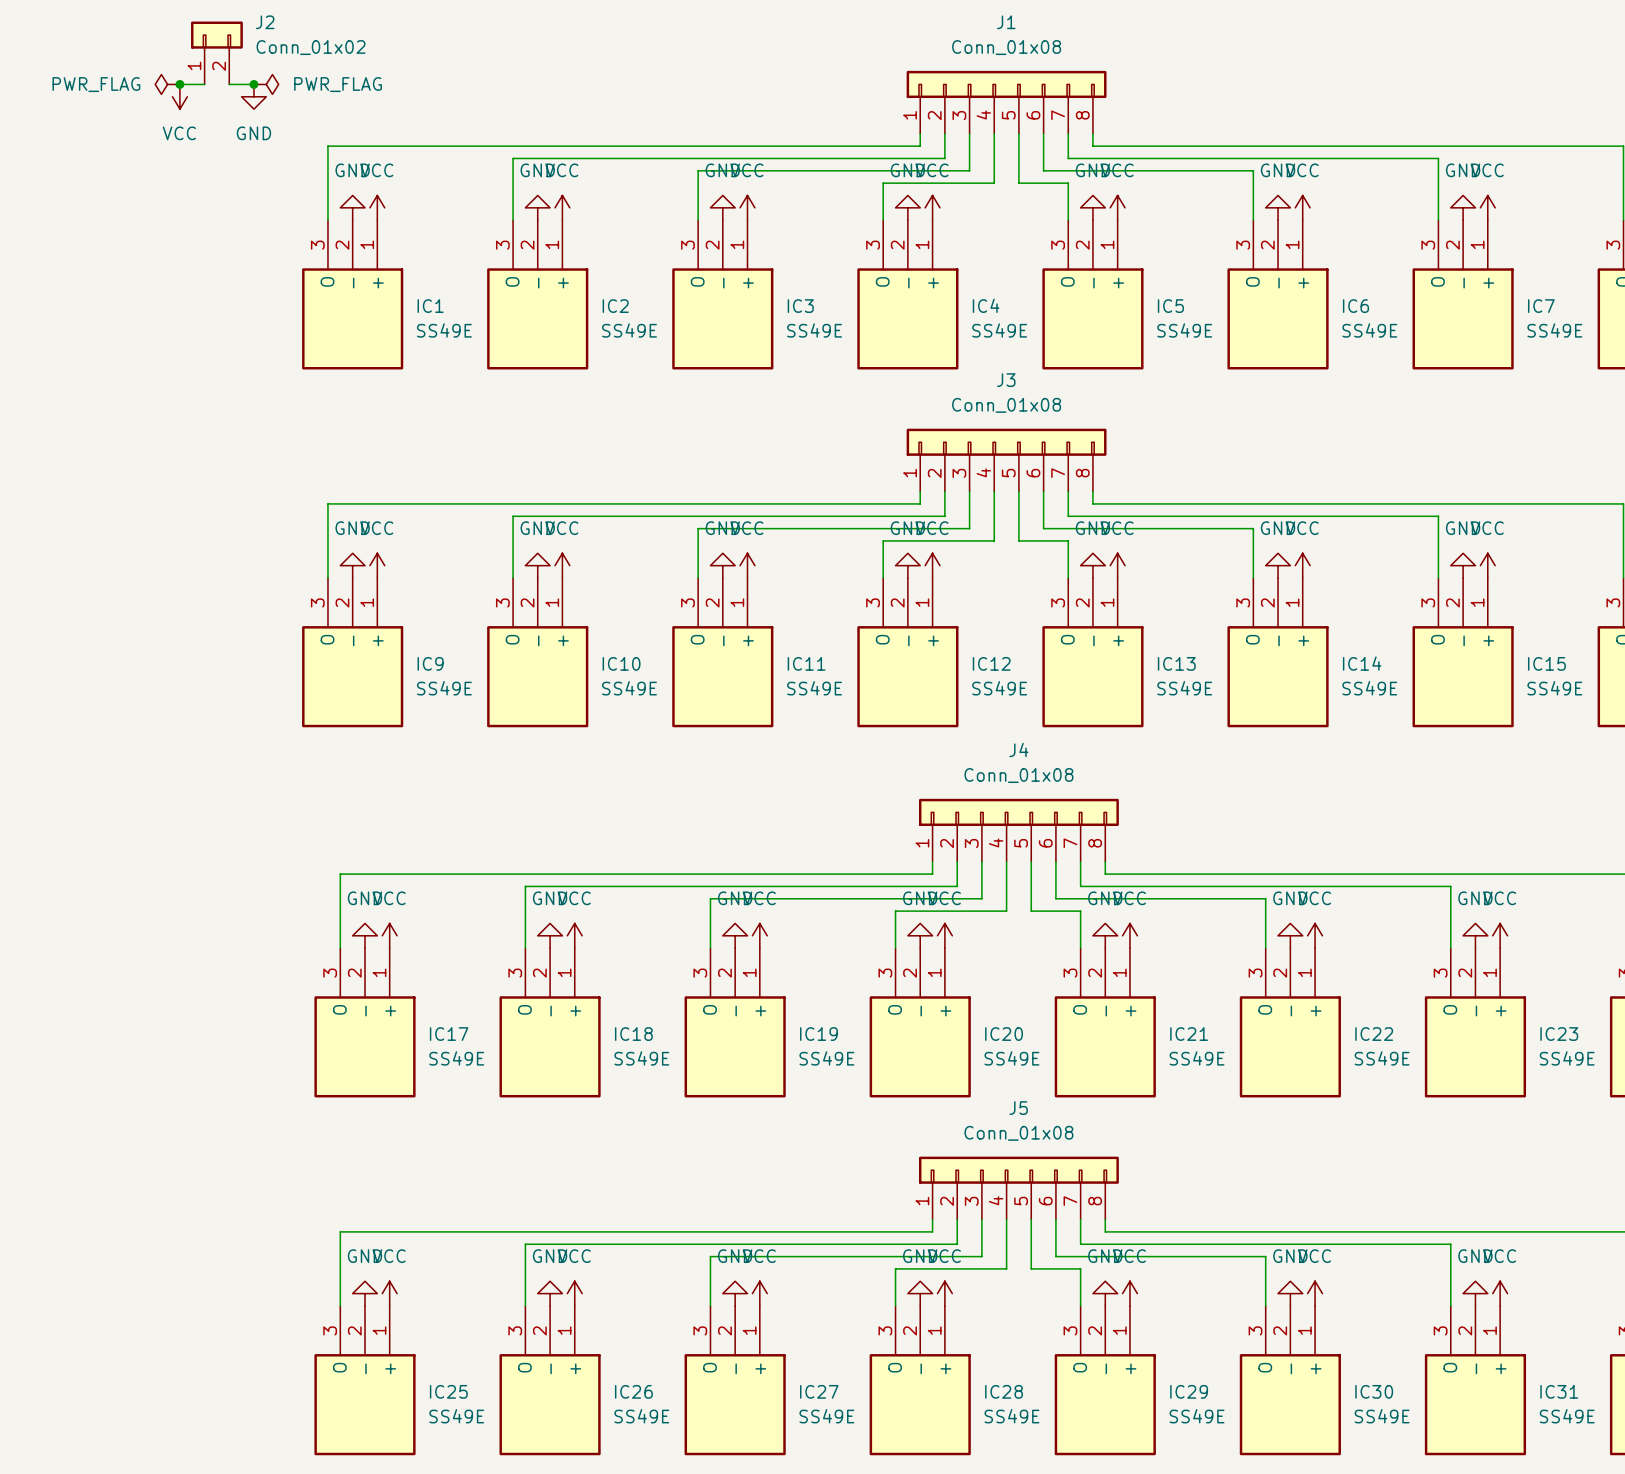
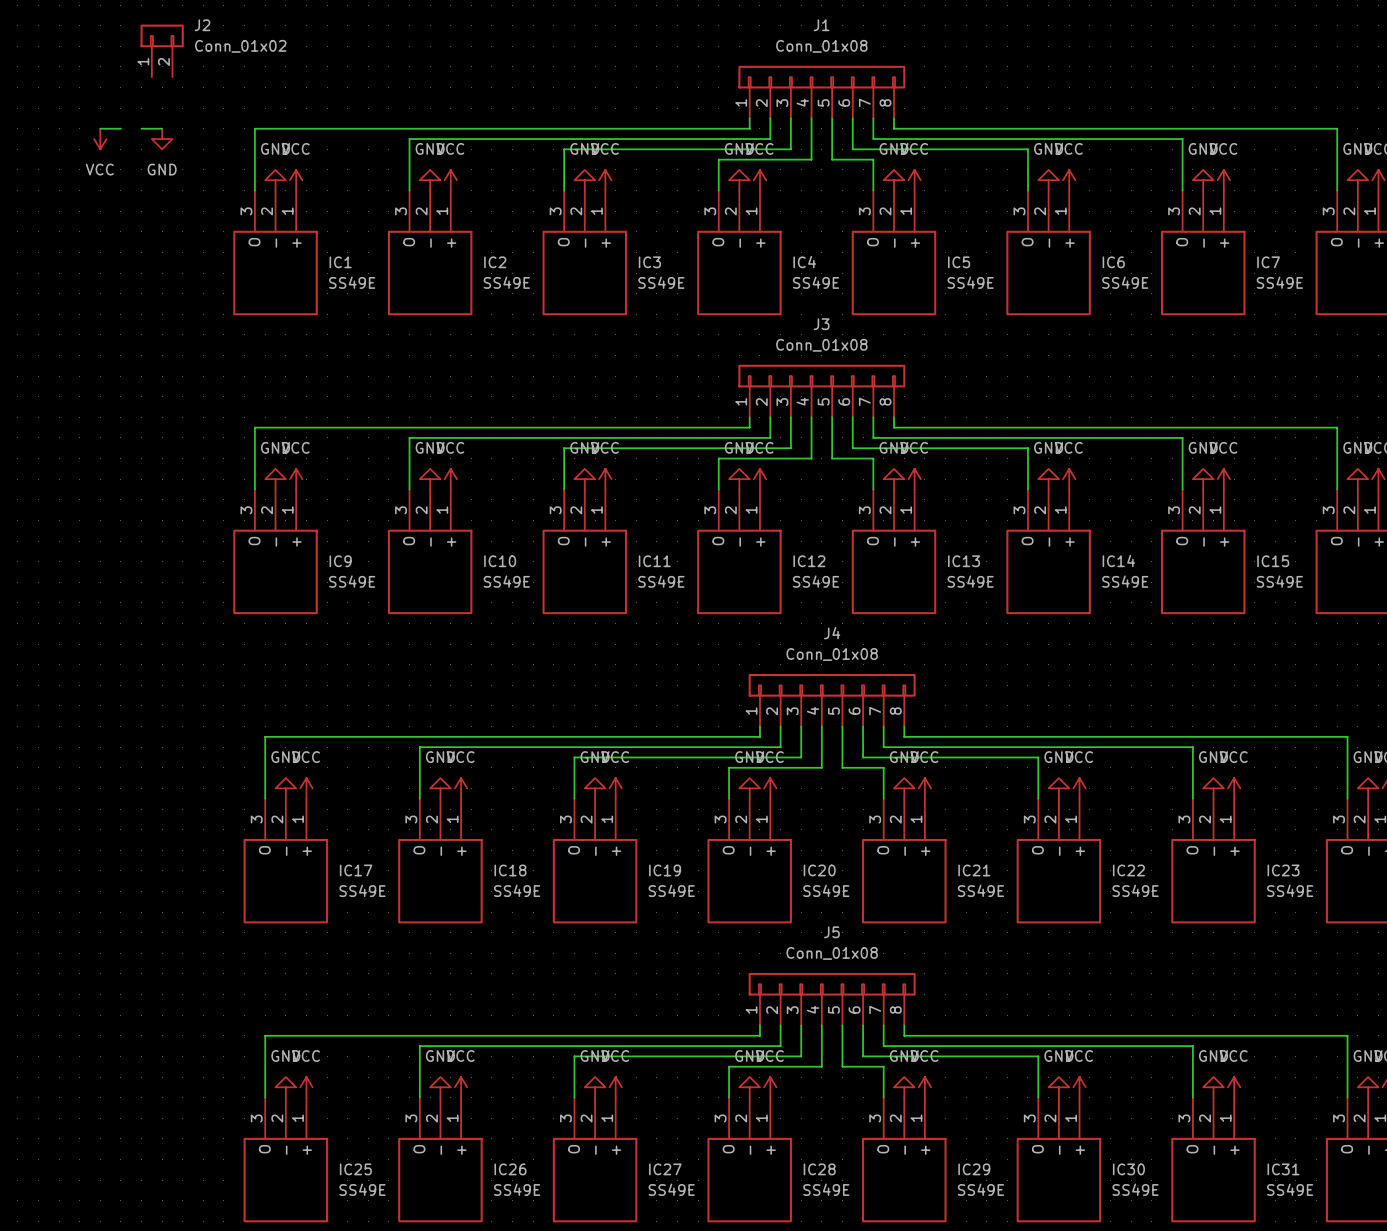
power symbol: PWR_FLAG (167, 84) -> none
wire: (179, 84) (204, 84) -> (100, 128) (120, 128)
junction: (179, 84) -> none
wire: (229, 84) (253, 84) -> (141, 128) (162, 128)
junction: (253, 84) -> none
power symbol: PWR_FLAG (266, 84) -> none
power symbol position: VCC (179, 96) -> VCC (100, 139)
power symbol position: GND (253, 96) -> GND (162, 139)

